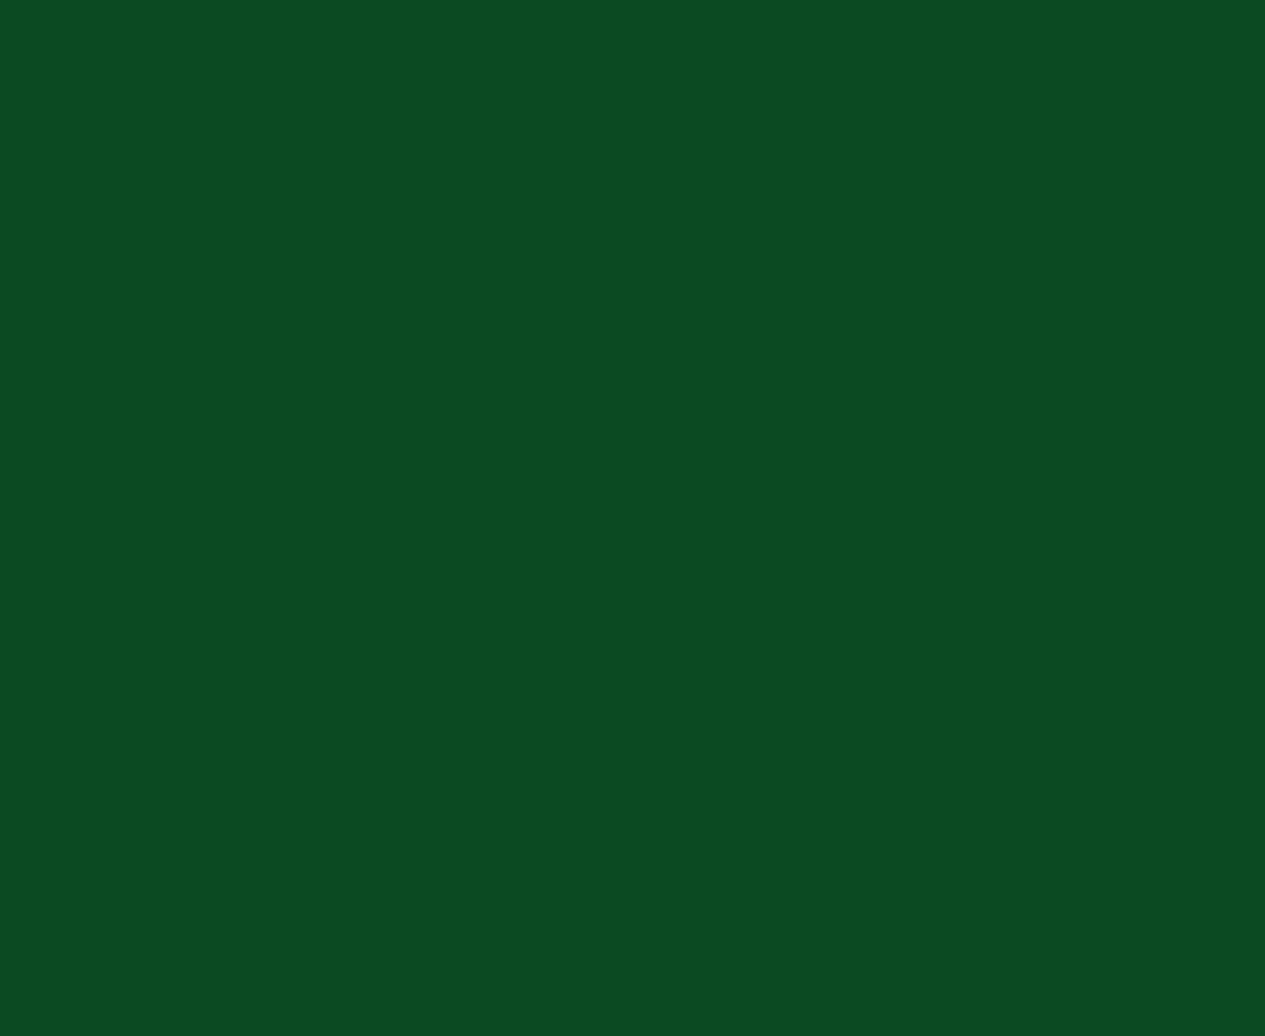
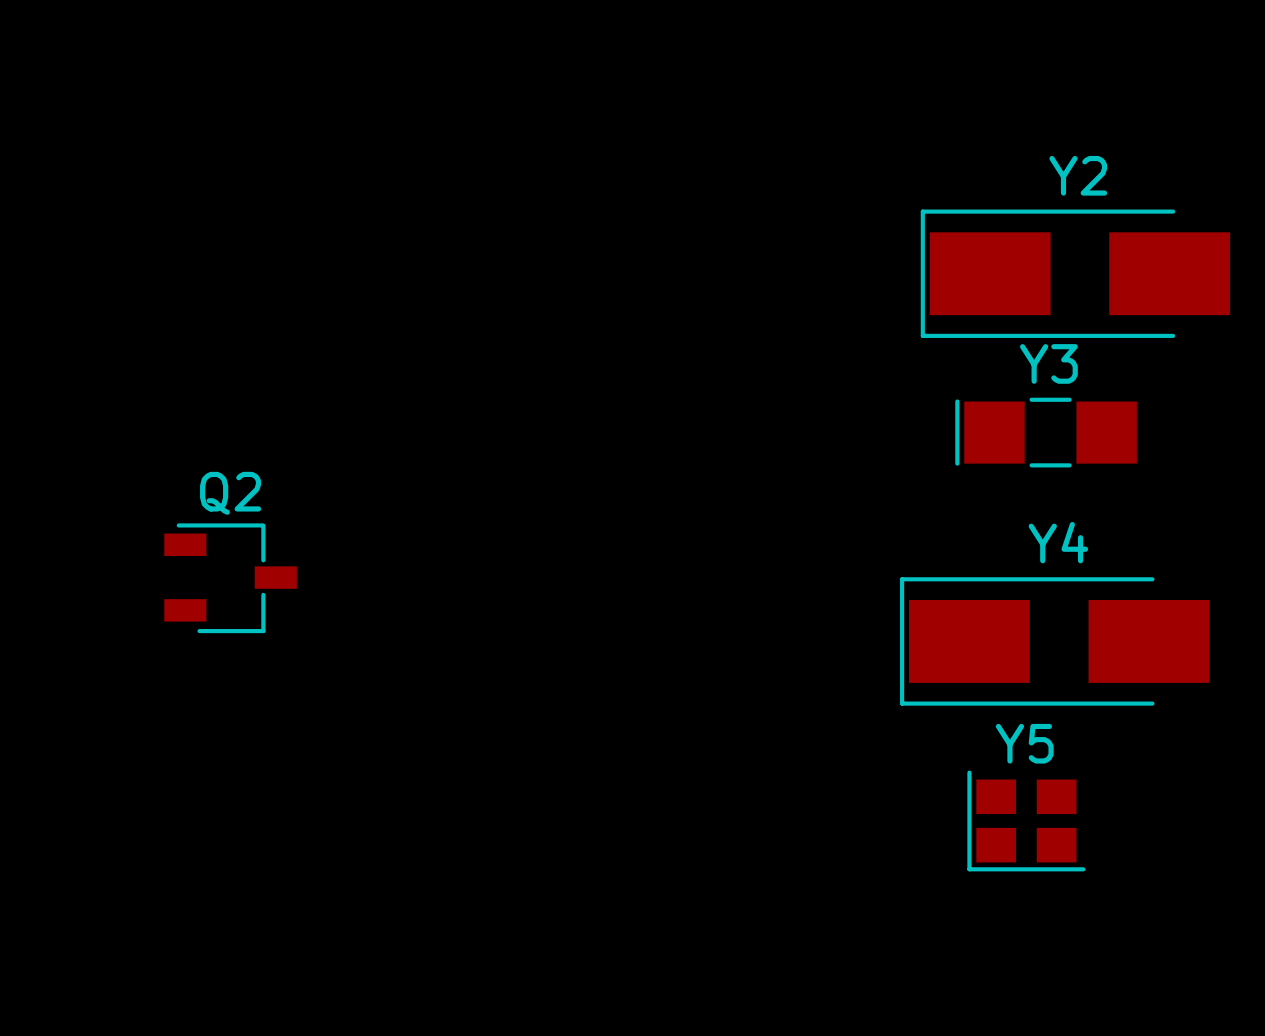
Y2: none -> (1075, 273)
Y3: none -> (1046, 432)
Q2: none -> (230, 578)
Y4: none -> (1054, 641)
Y5: none -> (1026, 820)

